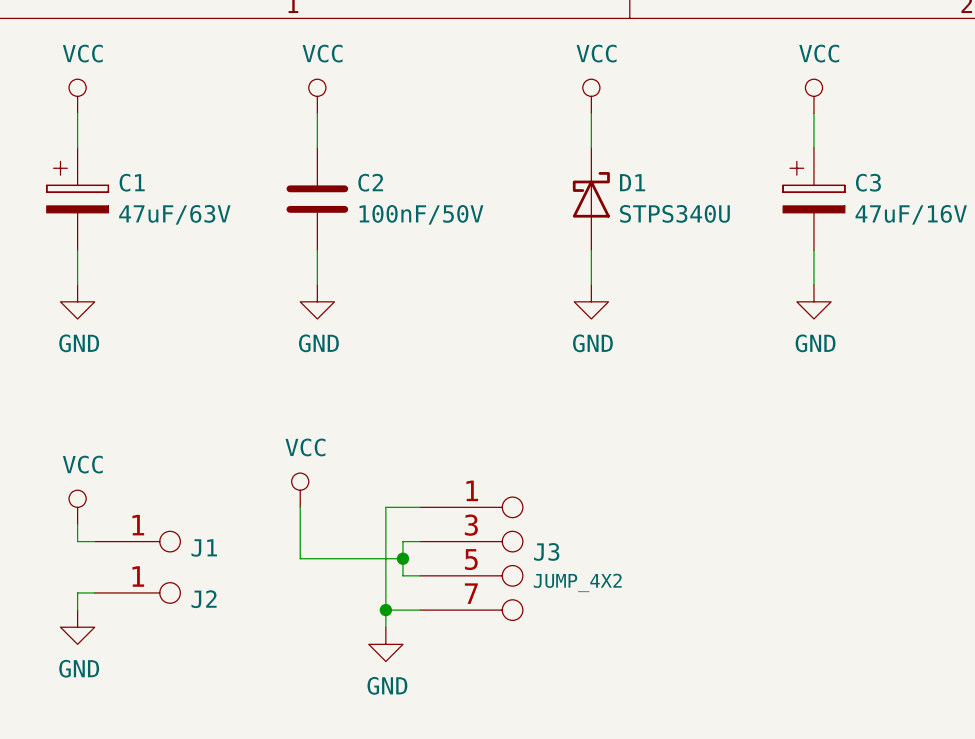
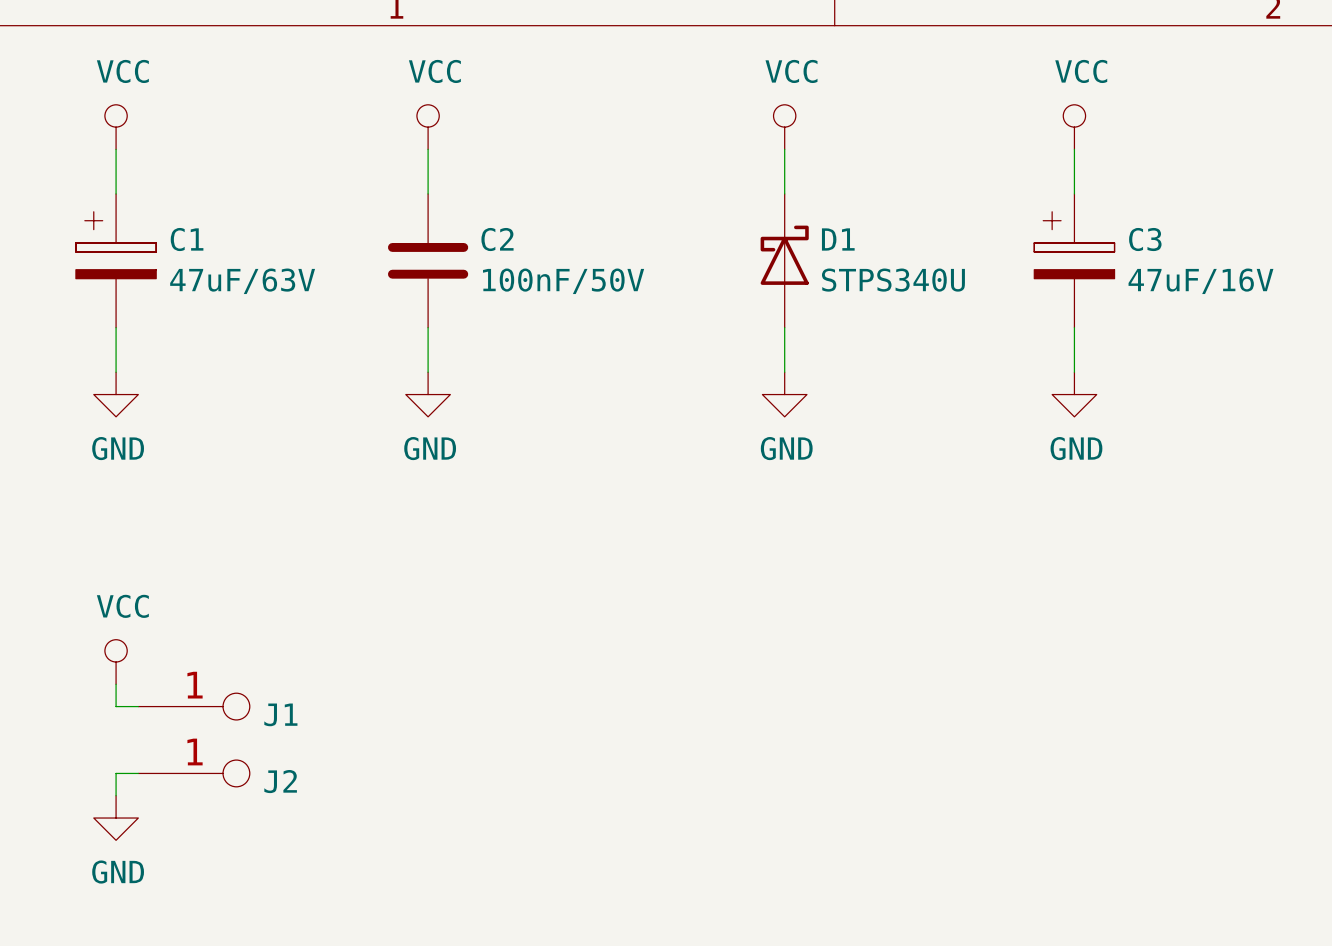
power symbol: VCC (300, 490) -> none
wire: (300, 507) (300, 558) (402, 558) -> none
wire: (420, 507) (385, 507) (385, 627) -> none
wire: (420, 541) (402, 541) (402, 575) (420, 575) -> none
junction: (402, 558) -> none
J3: JUMP_4X2 (471, 558) -> none
wire: (385, 610) (420, 610) -> none
junction: (385, 610) -> none
power symbol: GND (385, 644) -> none

